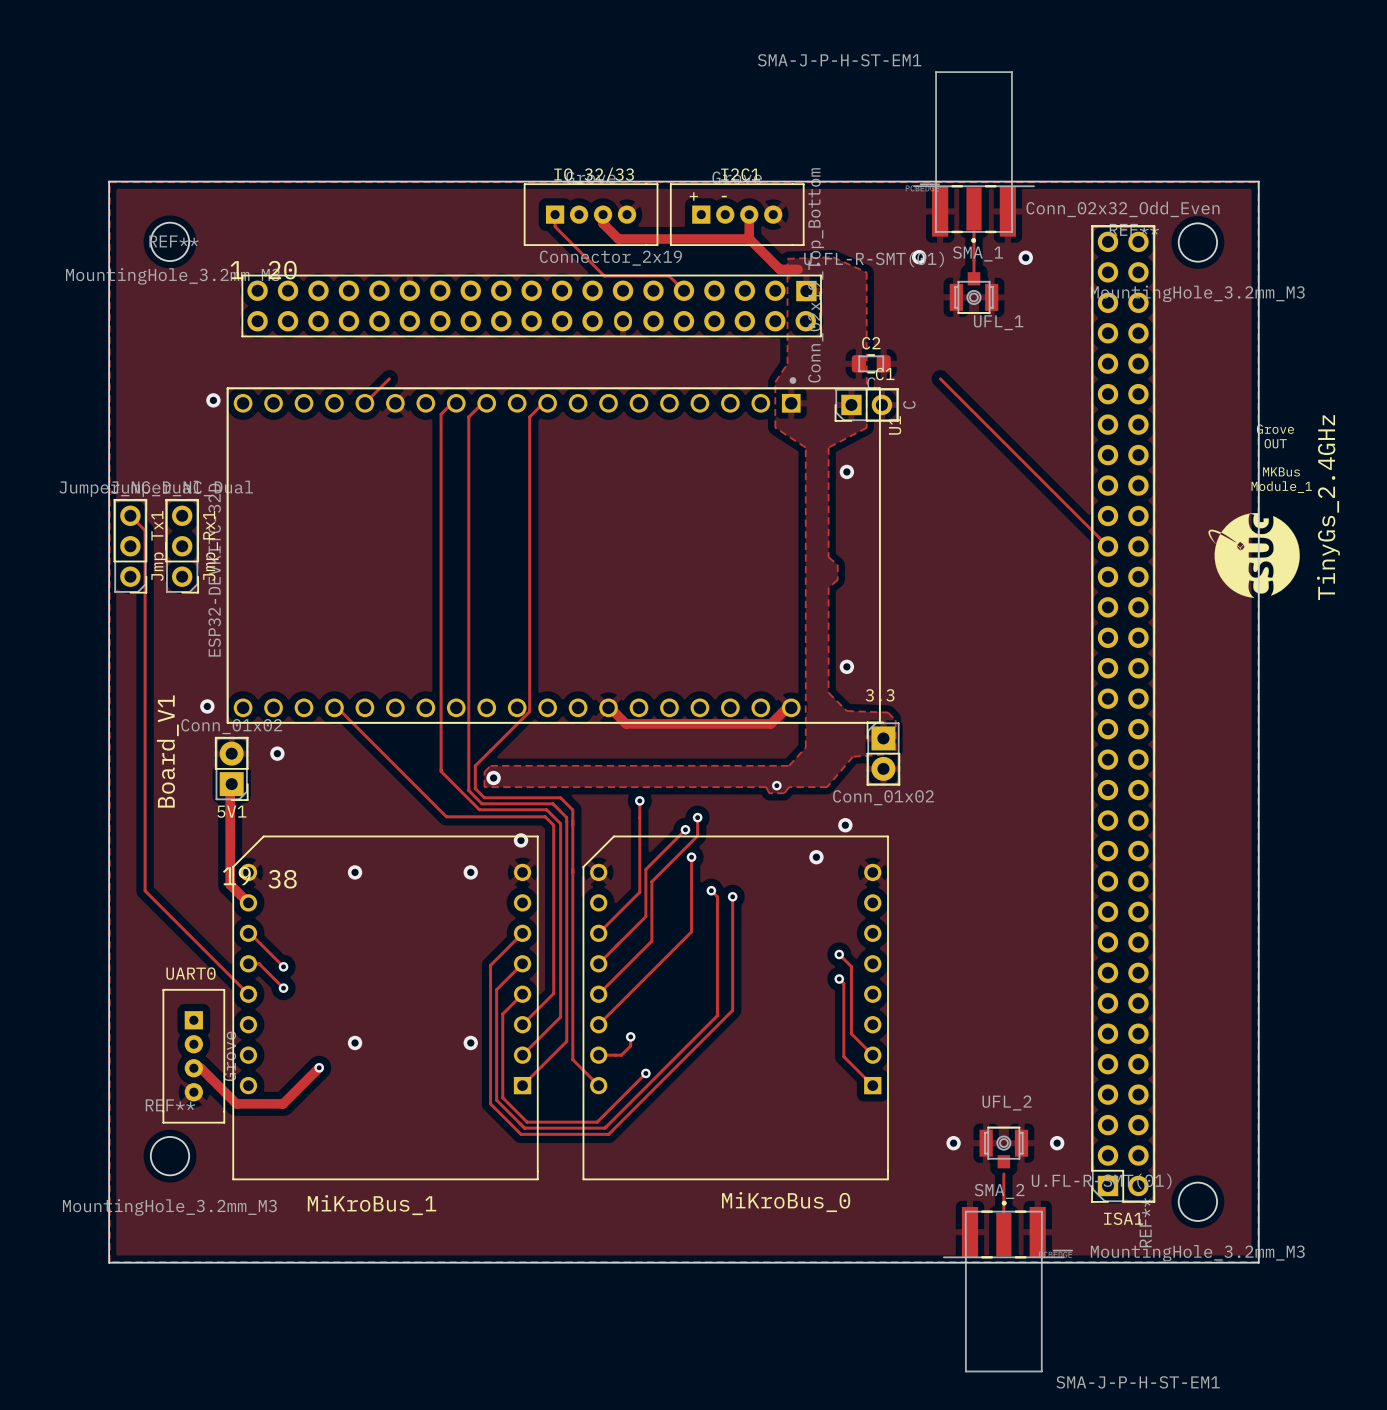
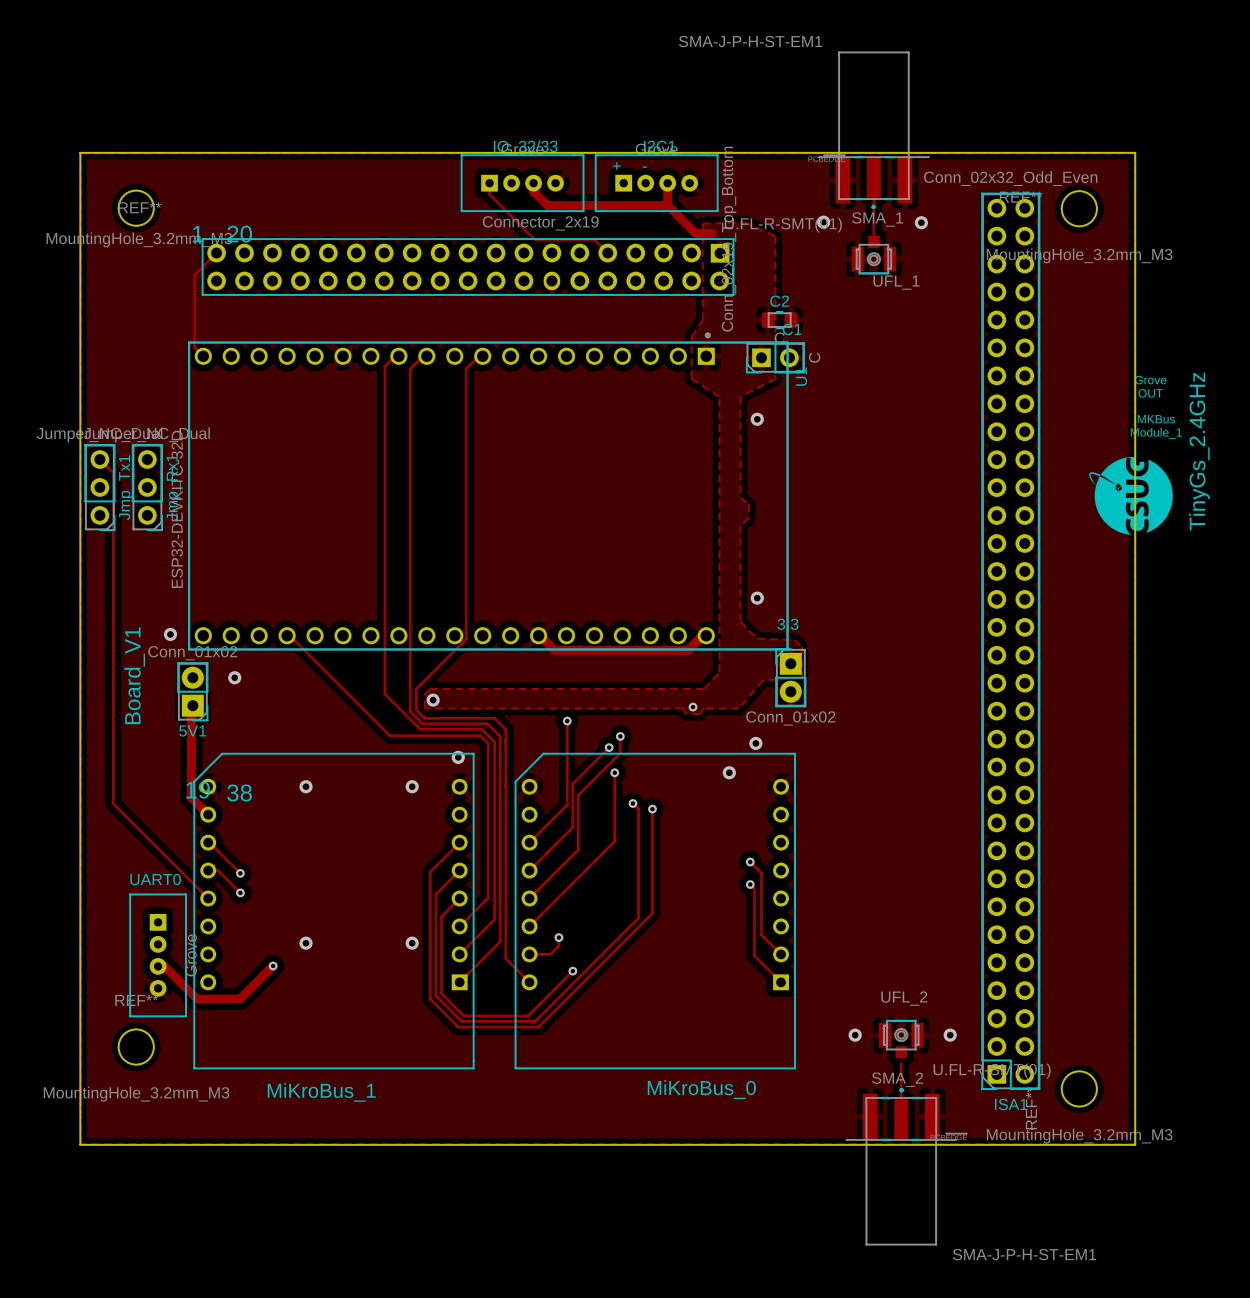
track: none -> (216, 253) (194, 274) (194, 347) (203, 356)
track: (389, 378) (364, 403) -> none
track: (940, 378) (1108, 546) -> none
via: (213, 400) -> none

